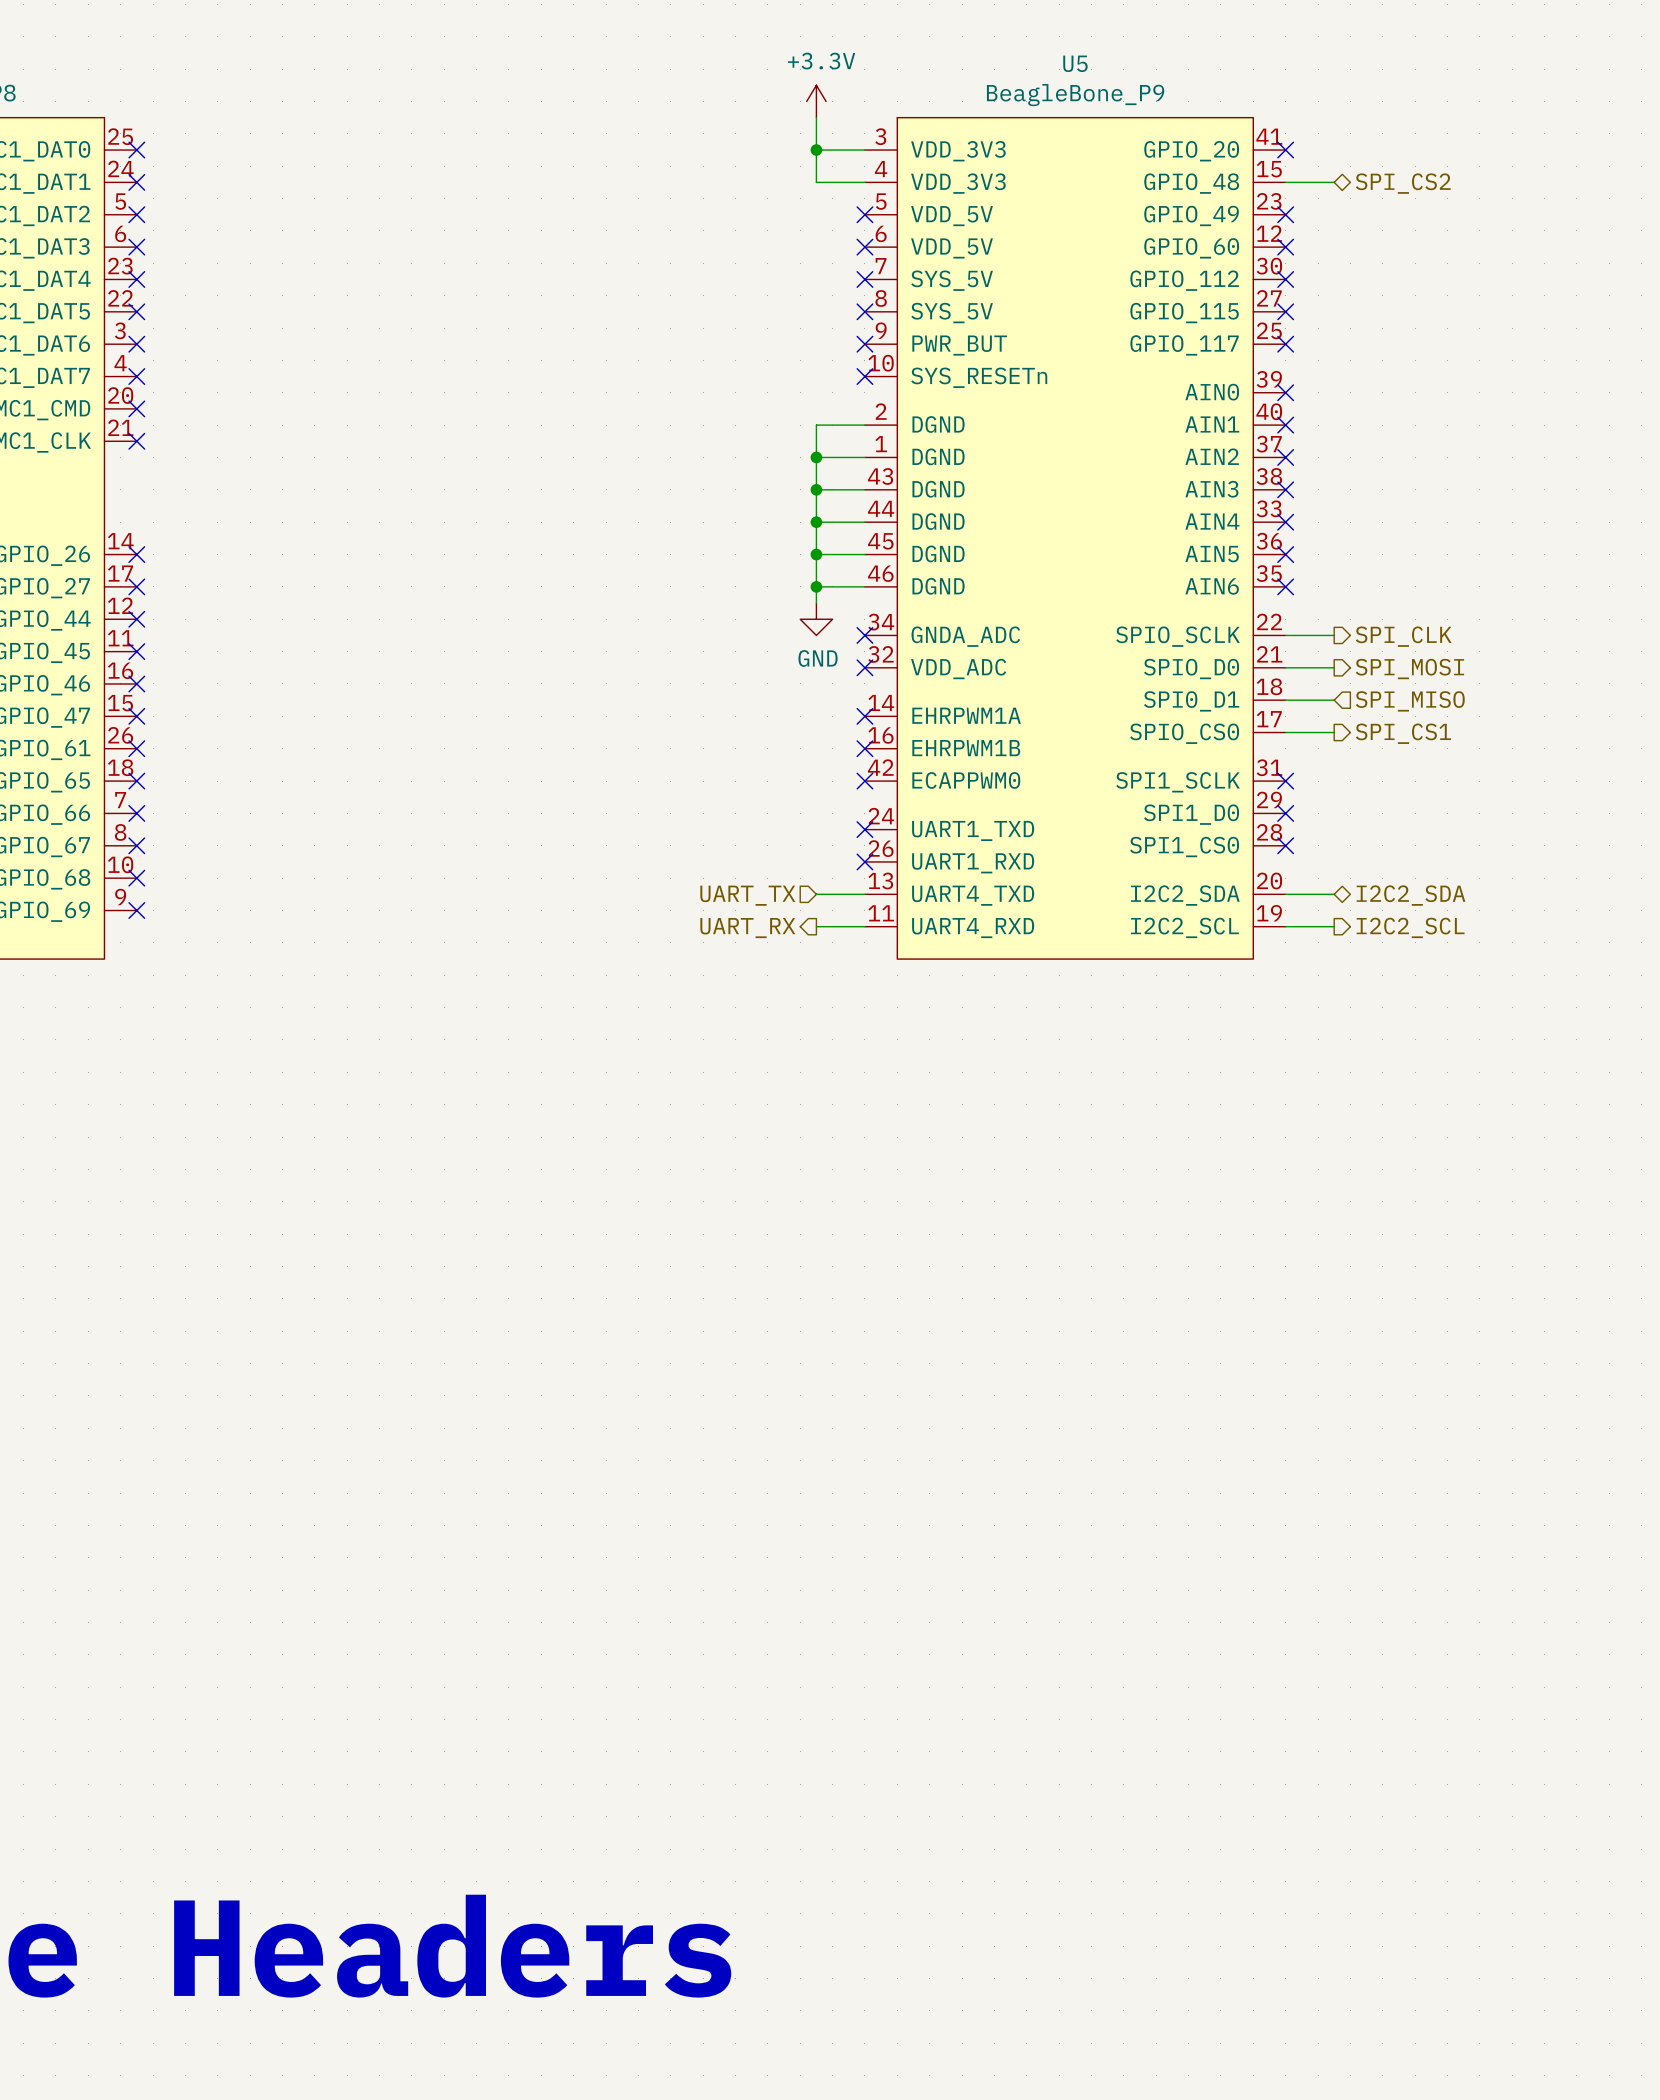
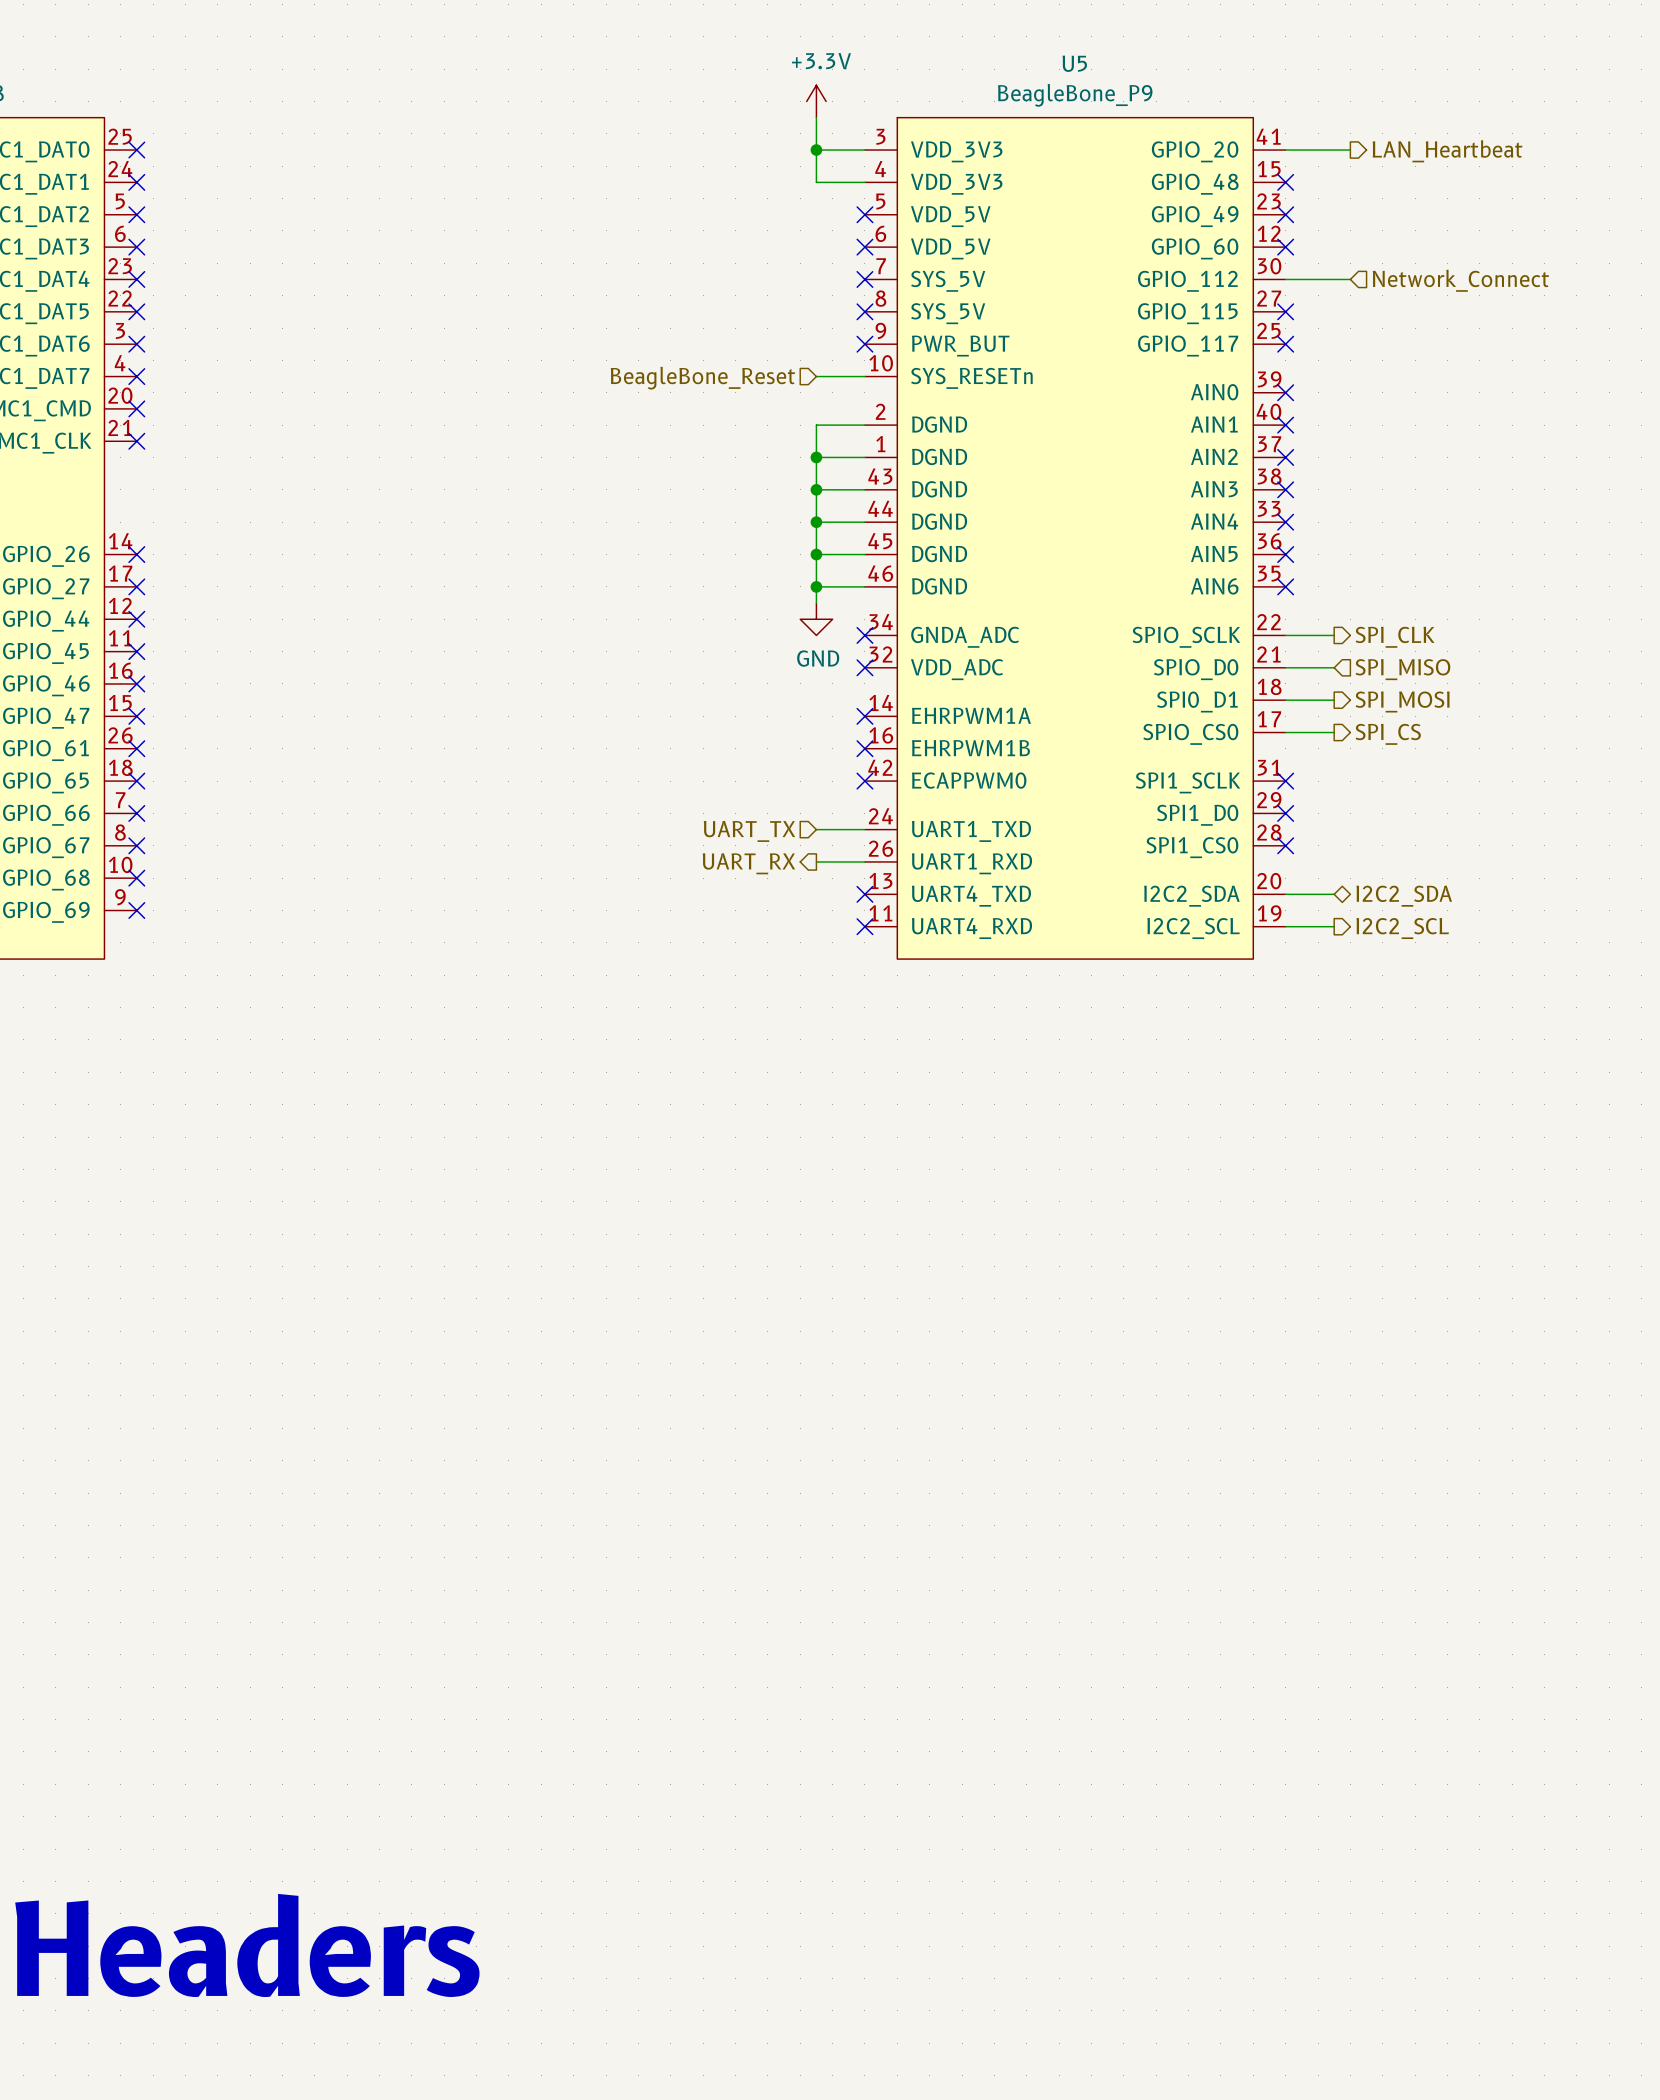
wire: none -> (1285, 150) (1350, 150)
no-connect mark position: (1285, 150) -> (1285, 182)
hierarchical label: none -> LAN_Heartbeat (1447, 151)
wire: (1285, 182) (1334, 182) -> none
hierarchical label: SPI_CS2 (1403, 183) -> none
wire: none -> (1285, 279) (1350, 279)
no-connect mark: (1285, 279) -> none
hierarchical label: none -> Network_Connect (1460, 280)
wire: none -> (816, 376) (864, 376)
no-connect mark: (864, 376) -> none
hierarchical label: none -> BeagleBone_Reset (702, 378)
hierarchical label shape: output (1409, 669) -> input (1402, 669)
hierarchical label: SPI_MOSI (1409, 669) -> SPI_MISO (1402, 669)
hierarchical label shape: input (1410, 701) -> output (1402, 701)
hierarchical label: SPI_MISO (1410, 701) -> SPI_MOSI (1402, 701)
hierarchical label: SPI_CS1 (1403, 733) -> SPI_CS (1388, 734)
no-connect mark: (864, 829) -> none
no-connect mark: (864, 861) -> none
wire: (816, 894) (864, 894) -> (816, 829) (864, 829)
no-connect mark: none -> (864, 894)
hierarchical label position: UART_TX (747, 895) -> UART_TX (749, 831)
wire: (816, 926) (864, 926) -> (816, 861) (864, 861)
no-connect mark: none -> (864, 926)
hierarchical label position: UART_RX (747, 928) -> UART_RX (748, 863)

